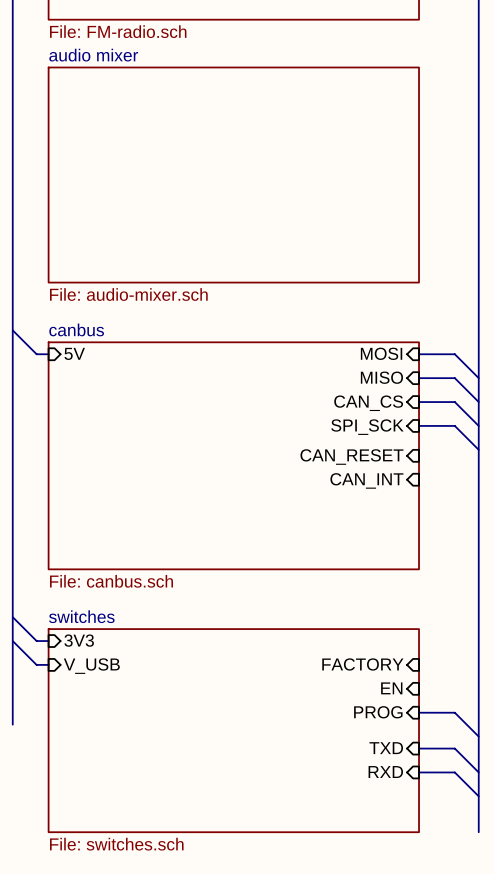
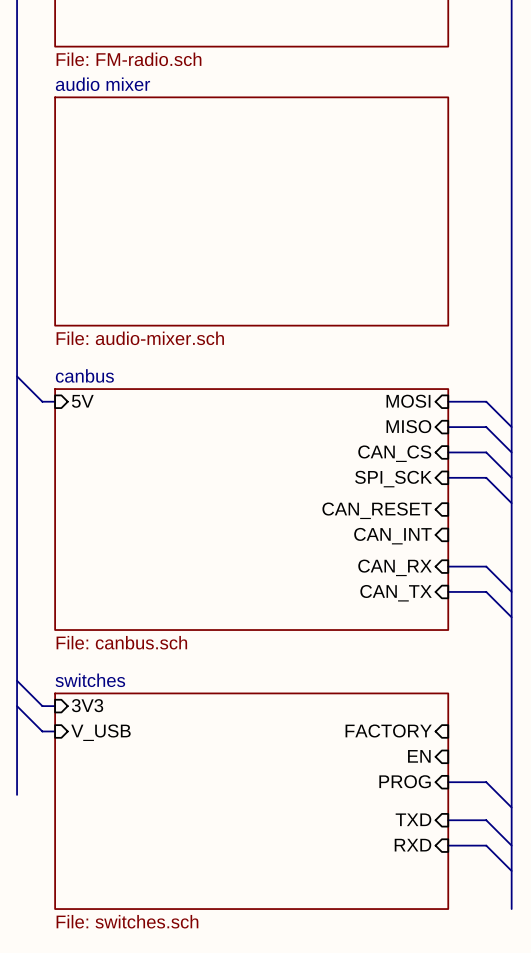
wire: none -> (448, 566) (486, 566) (511, 591)
sheet pin: none -> CAN_RX (395, 567)
wire: none -> (448, 591) (486, 591) (511, 617)
sheet pin: none -> CAN_TX (396, 593)

